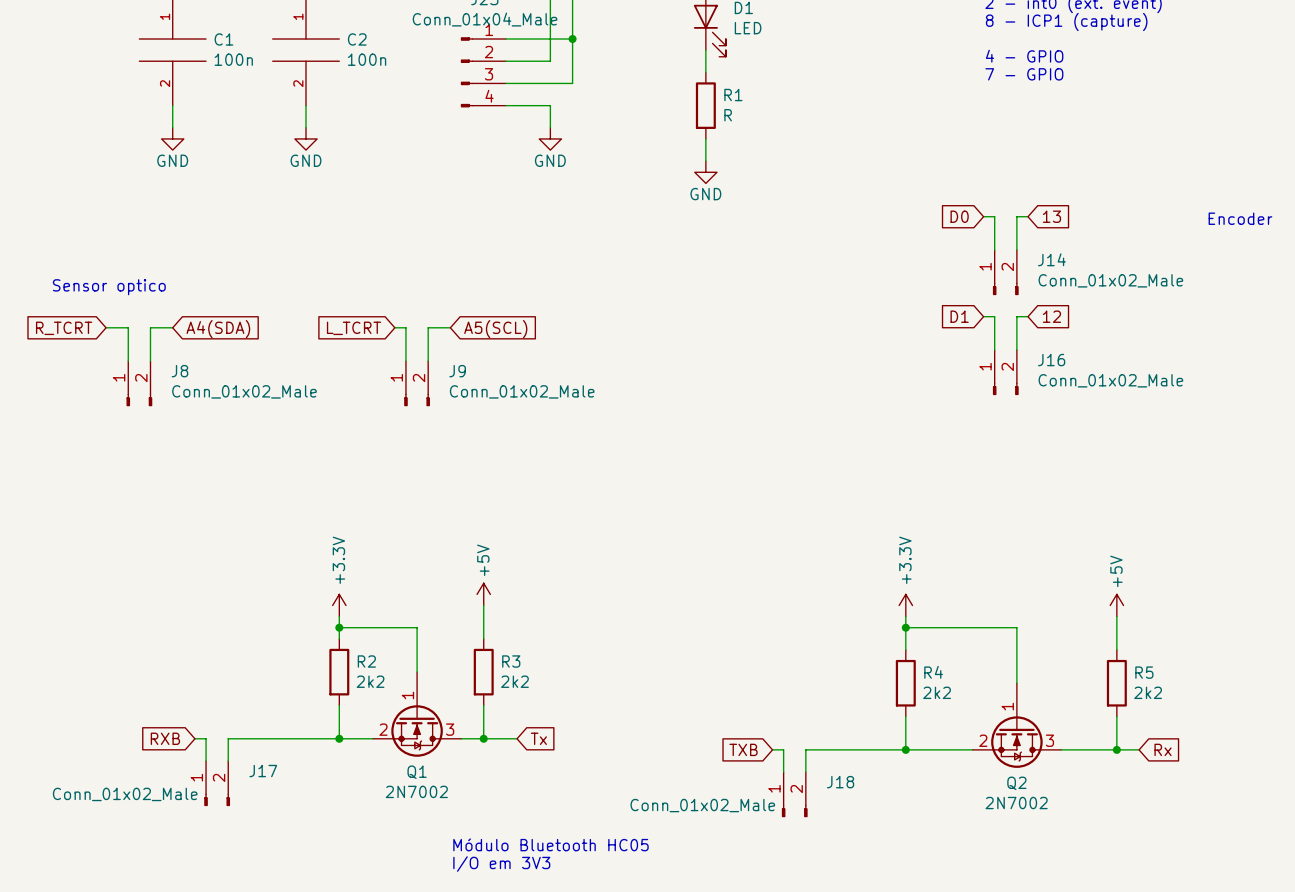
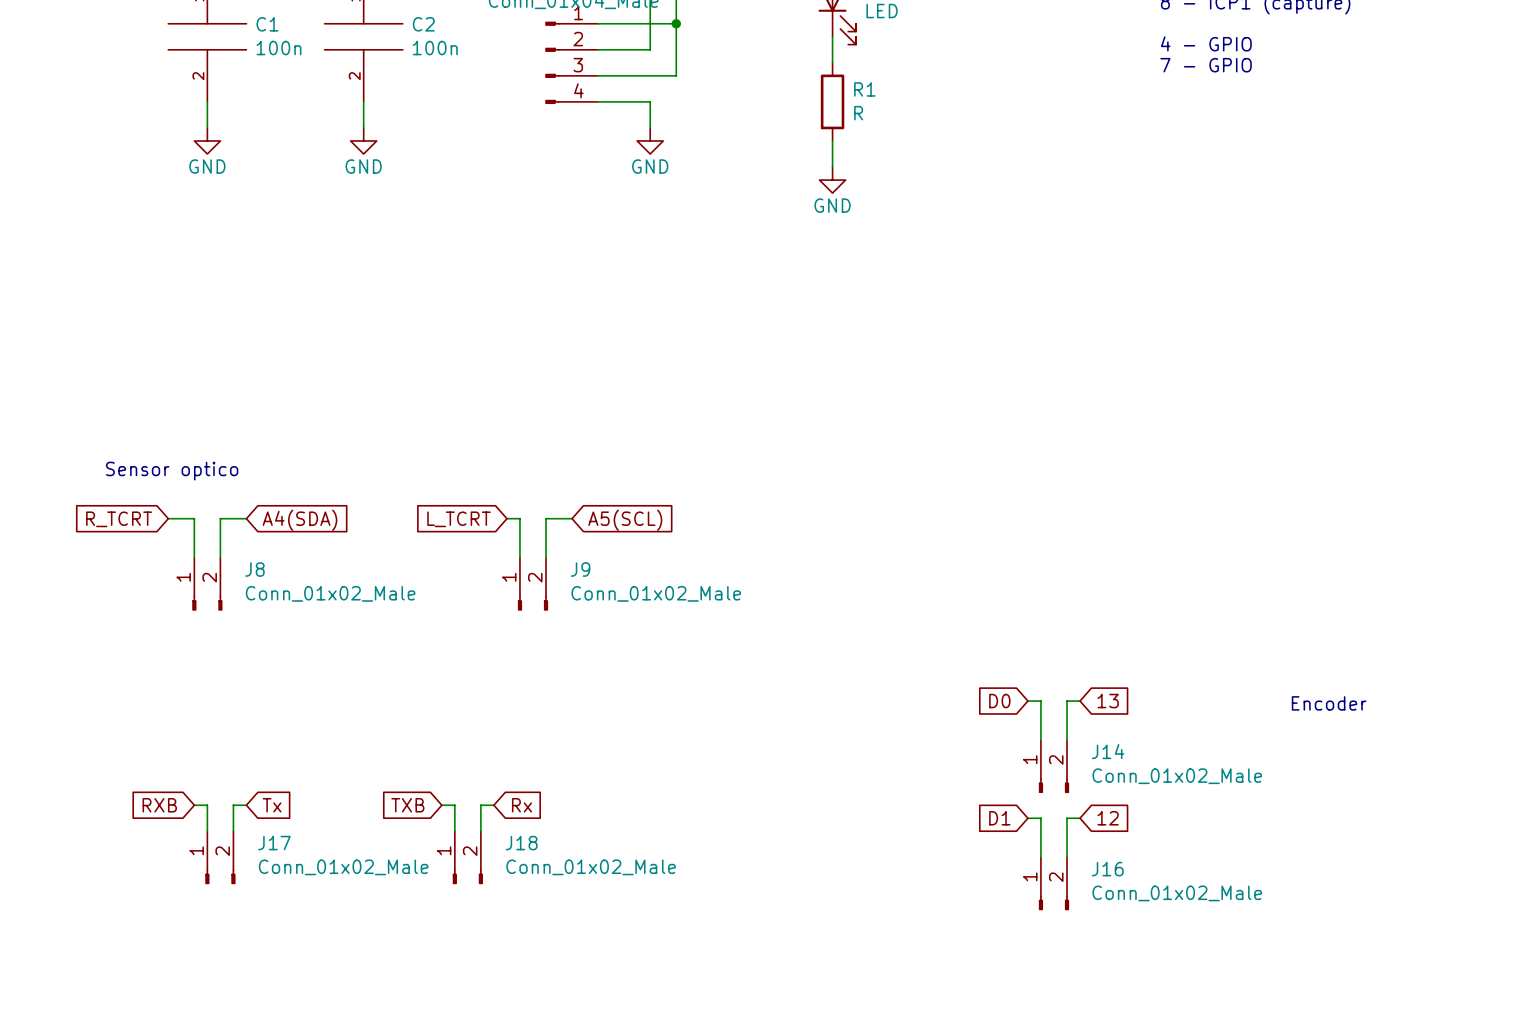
global label: D0 (959, 216) -> none
wire: (983, 216) (994, 216) (994, 250) -> none
wire: (1028, 216) (1016, 216) (1016, 250) -> none
global label: 13 (1051, 216) -> none
text: Encoder (1240, 218) -> none
J14 position: (1005, 272) -> (1053, 766)
text position: Sensor optico (109, 287) -> Sensor optico (172, 471)
global label: D1 (959, 316) -> none
wire: (983, 316) (994, 316) (994, 350) -> none
wire: (1028, 316) (1016, 316) (1016, 350) -> none
global label: 12 (1051, 316) -> none
wire: (106, 327) (128, 327) (128, 361) -> (168, 518) (194, 518) (194, 557)
wire: (172, 327) (150, 327) (150, 361) -> (246, 518) (220, 518) (220, 557)
wire: (394, 327) (405, 327) (405, 361) -> (506, 518) (519, 518) (519, 557)
wire: (450, 327) (428, 327) (428, 361) -> (572, 518) (546, 518) (546, 557)
global label position: R_TCRT (64, 328) -> R_TCRT (119, 519)
global label position: L_TCRT (353, 328) -> L_TCRT (459, 519)
global label position: A4(SDA) (218, 329) -> A4(SDA) (299, 520)
global label position: A5(SCL) (495, 329) -> A5(SCL) (625, 520)
J16 position: (1005, 372) -> (1053, 883)
J8 position: (139, 383) -> (207, 584)
J9 position: (417, 383) -> (532, 584)
power symbol: +5V (483, 594) -> none
power symbol: +3.3V (339, 605) -> none
wire: (483, 605) (483, 638) -> none
power symbol: +3.3V (905, 605) -> none
power symbol: +5V (1116, 605) -> none
wire: (339, 616) (339, 638) -> none
global label: none -> D0 (999, 701)
wire: none -> (1027, 701) (1040, 701) (1040, 740)
wire: none -> (1067, 701) (1080, 701)
global label: none -> 13 (1108, 701)
wire: (1116, 616) (1116, 649) -> none
text: none -> Encoder (1329, 703)
wire: (339, 627) (417, 627) (417, 672) -> none
junction: (339, 627) -> none
wire: (905, 627) (1016, 627) (1016, 683) -> none
junction: (905, 627) -> none
R2: 2k2 (339, 672) -> none
R3: 2k2 (483, 672) -> none
R4: 2k2 (905, 683) -> none
R5: 2k2 (1116, 683) -> none
wire: none -> (246, 805) (233, 805) (233, 831)
global label: none -> Tx (272, 805)
wire: (339, 705) (339, 738) -> none
global label: none -> TXB (407, 805)
wire: none -> (441, 805) (454, 805) (454, 831)
wire: none -> (493, 805) (480, 805) (480, 831)
global label: none -> Rx (522, 805)
wire: (483, 705) (483, 738) -> none
Q1: 2N7002 (417, 714) -> none
global label: none -> D1 (999, 818)
wire: none -> (1027, 818) (1040, 818) (1040, 857)
wire: none -> (1067, 818) (1080, 818)
global label: none -> 12 (1108, 818)
wire: (1116, 716) (1116, 749) -> none
Q2: 2N7002 (1016, 725) -> none
global label position: RXB (165, 738) -> RXB (159, 805)
wire: (194, 738) (206, 738) (206, 761) -> (194, 805) (207, 805) (207, 831)
junction: (339, 738) -> none
wire: (372, 738) (228, 738) (228, 761) -> none
wire: (461, 738) (517, 738) -> none
junction: (483, 738) -> none
global label: Tx (538, 738) -> none
global label: TXB (743, 749) -> none
wire: (772, 749) (783, 749) (783, 772) -> none
junction: (905, 749) -> none
wire: (972, 749) (805, 749) (805, 772) -> none
wire: (1061, 749) (1139, 749) -> none
junction: (1116, 749) -> none
global label: Rx (1163, 749) -> none
J17 position: (217, 783) -> (220, 857)
J17 value position: Conn_01x02_Male (125, 794) -> Conn_01x02_Male (343, 867)
J18 position: (794, 794) -> (467, 857)
J18 value position: Conn_01x02_Male (702, 805) -> Conn_01x02_Male (591, 867)
text: Módulo Bluetooth HC05 (550, 844) -> none
text: I/O em 3V3 (501, 864) -> none

